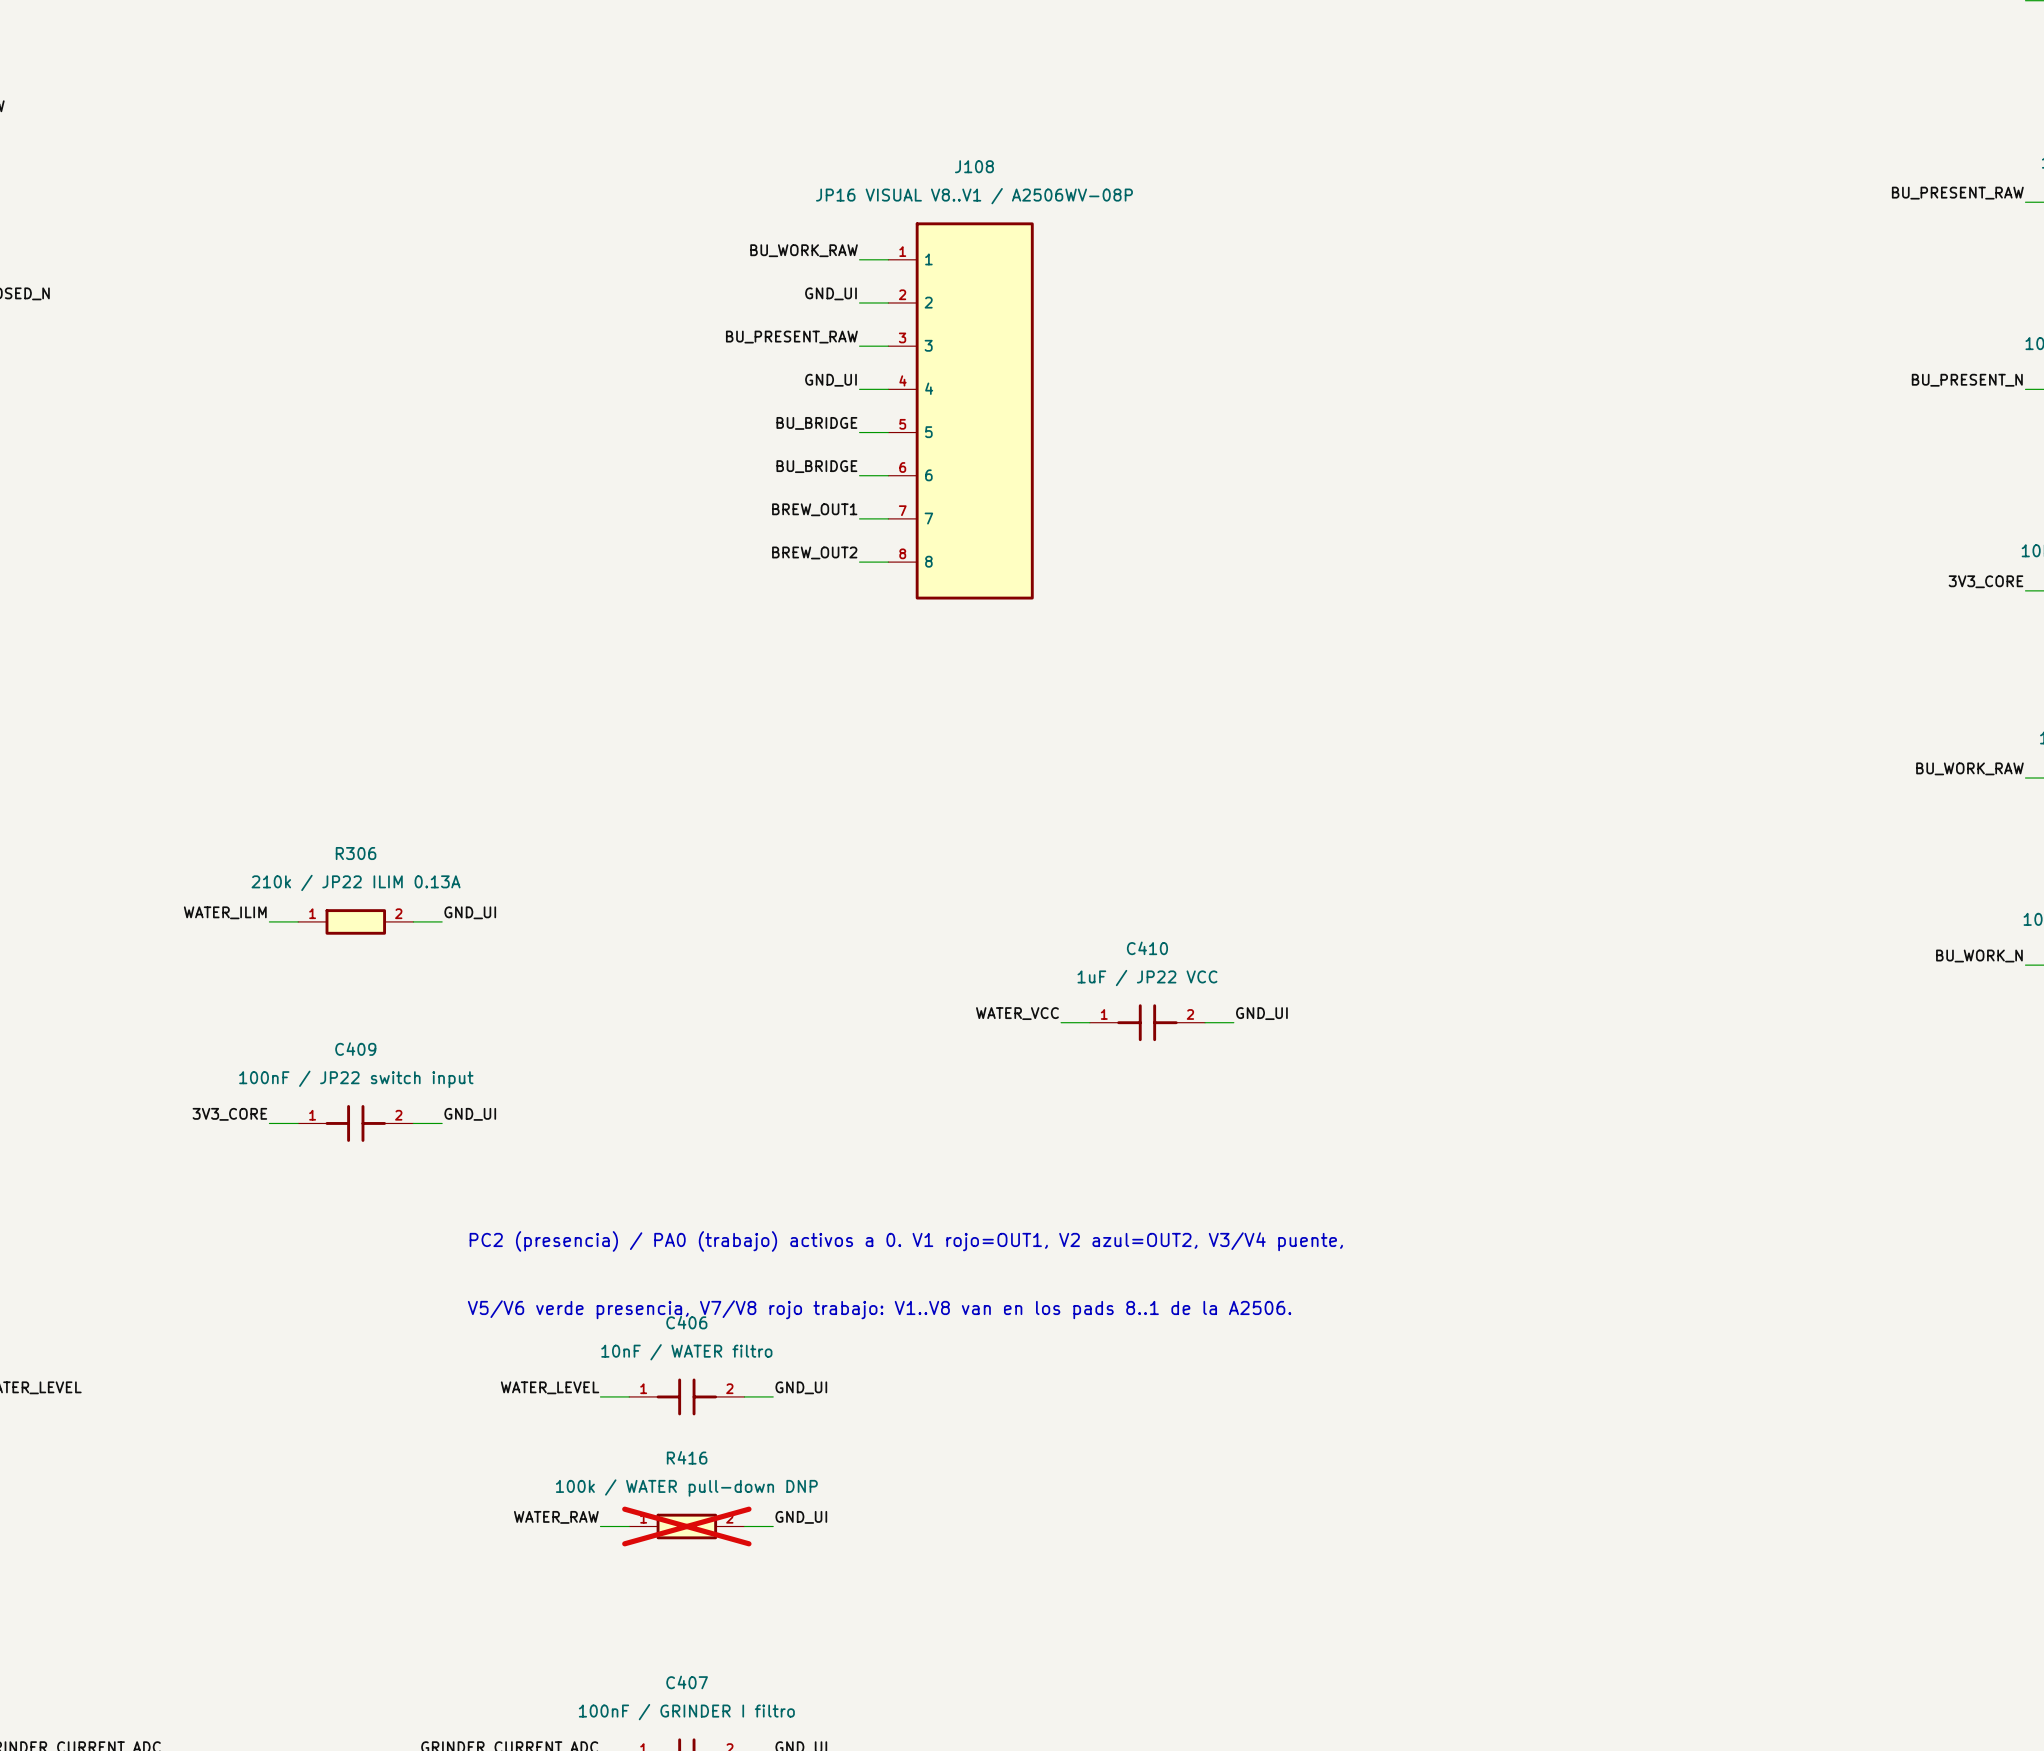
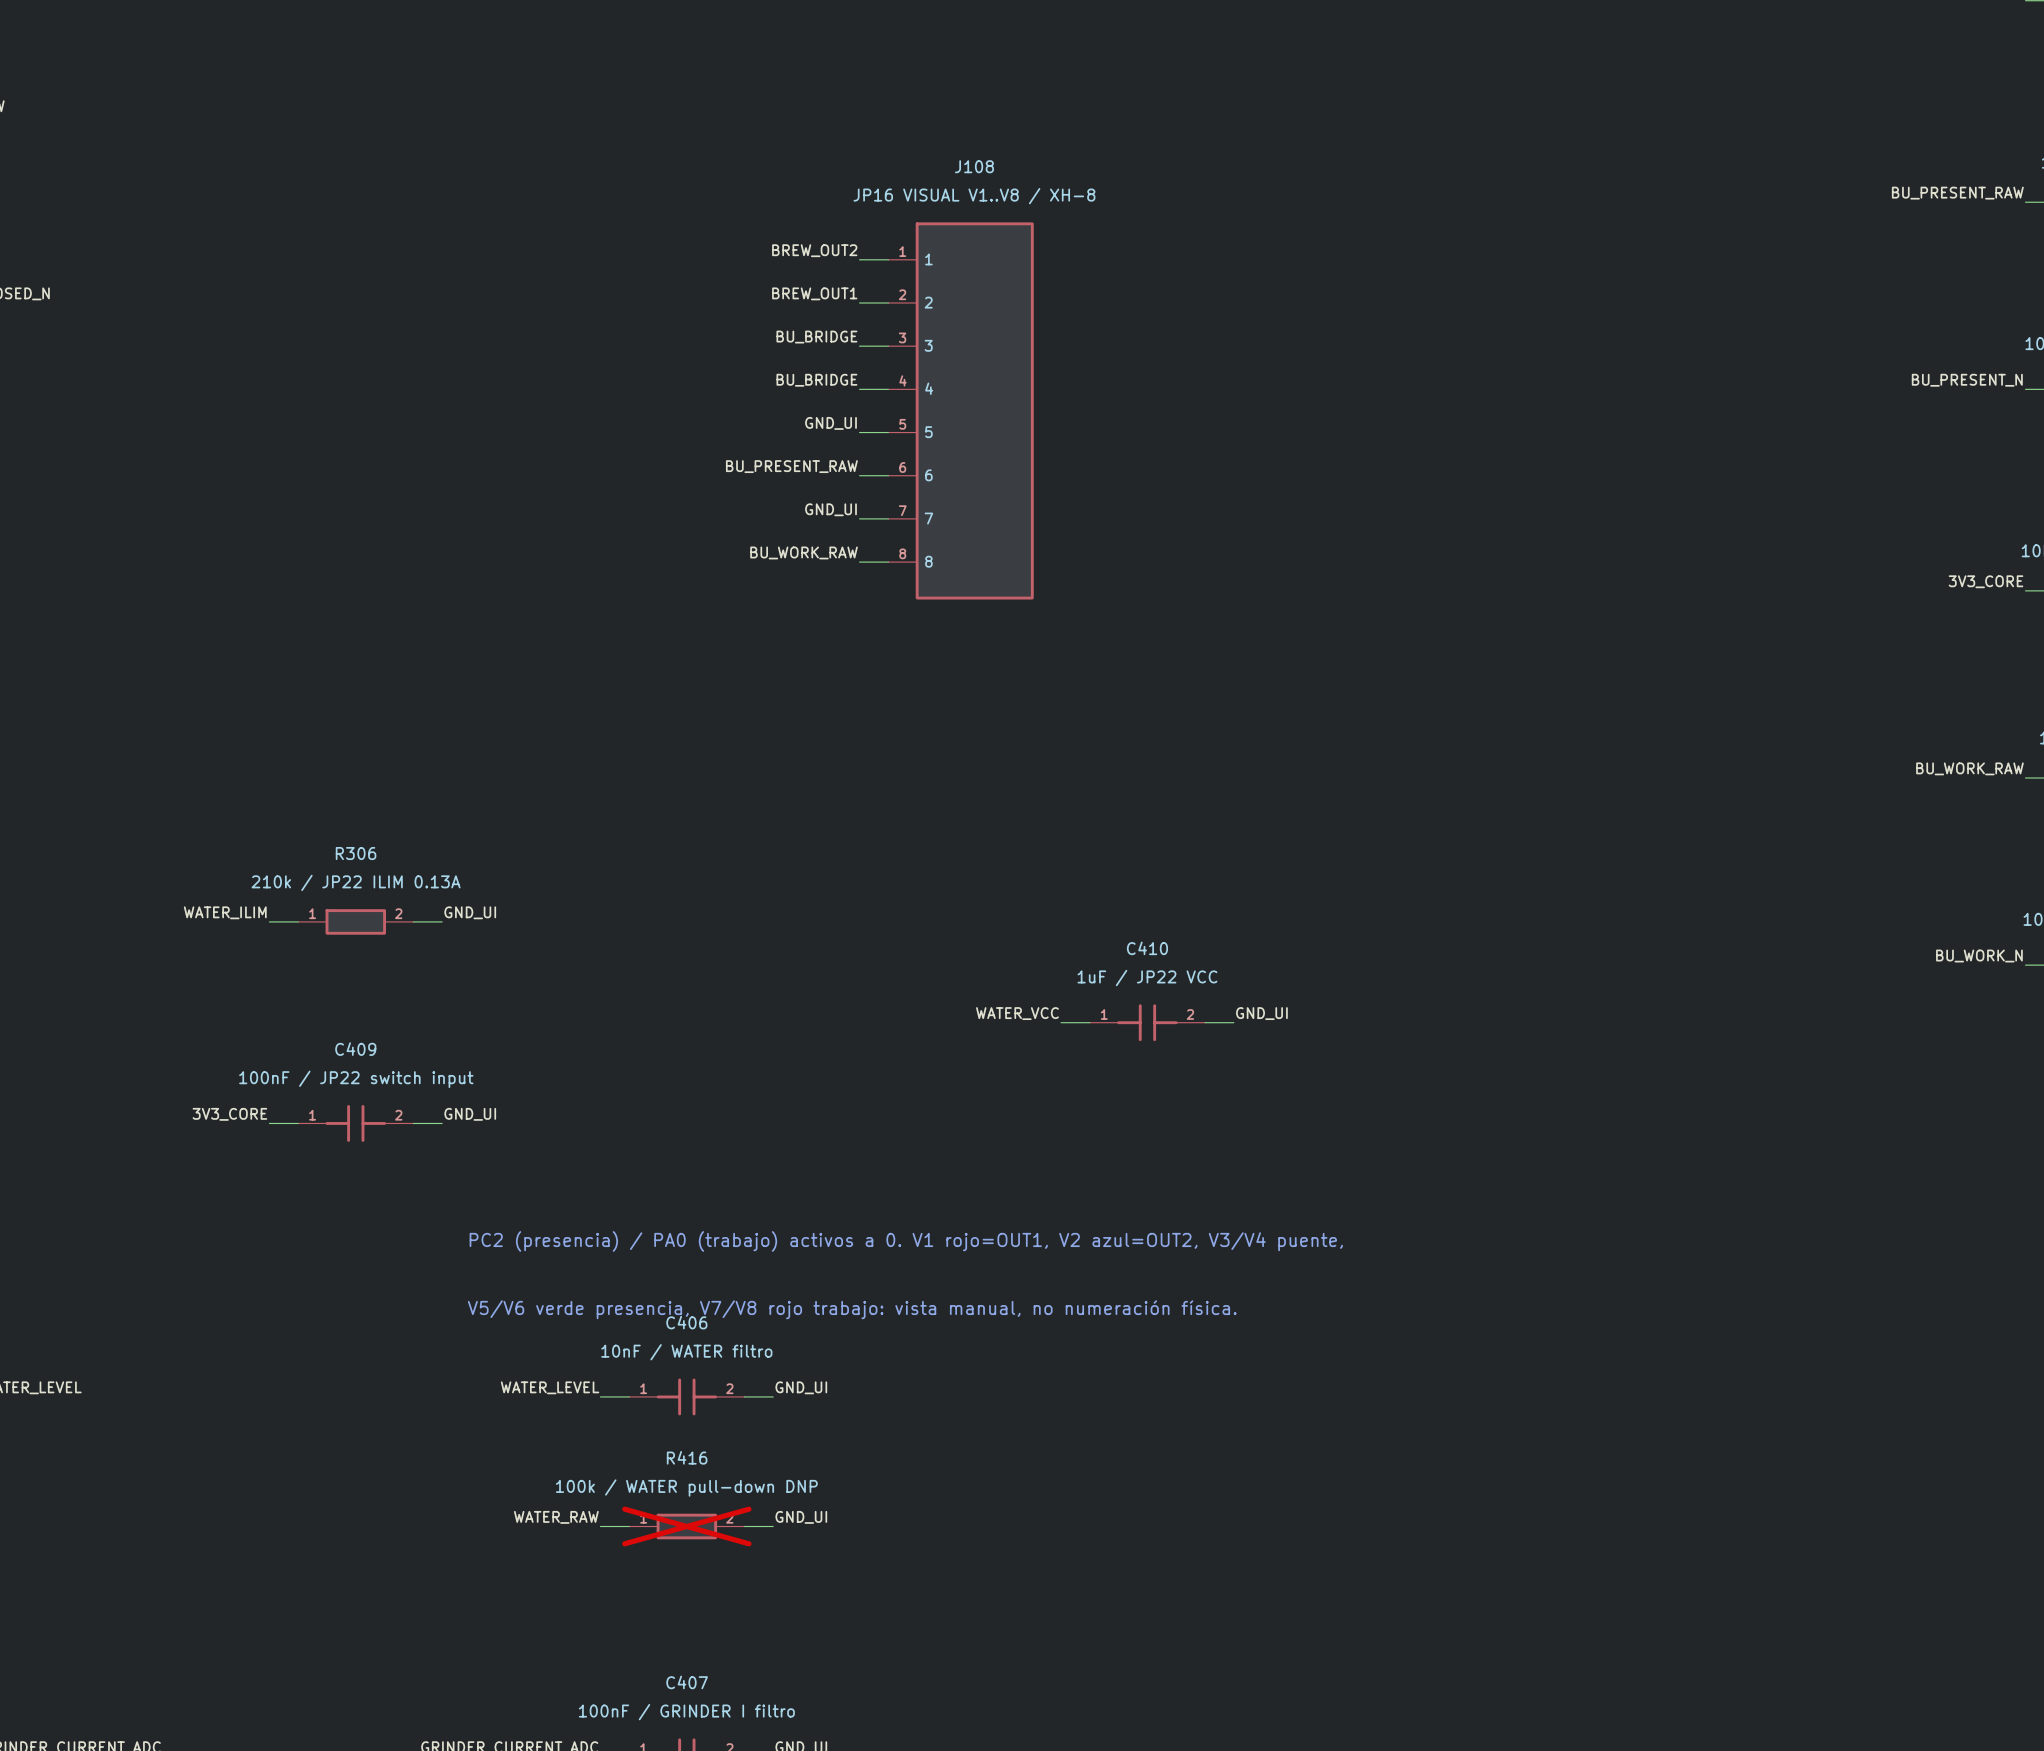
J108 value: JP16 VISUAL V8..V1 / A2506WV-08P (974, 196) -> JP16 VISUAL V1..V8 / XH-8 (974, 196)
label: BU_WORK_RAW (804, 250) -> BREW_OUT2 (814, 250)
label: GND_UI (830, 293) -> BREW_OUT1 (814, 293)
label: BU_PRESENT_RAW (791, 337) -> BU_BRIDGE (816, 337)
label: GND_UI (830, 380) -> BU_BRIDGE (816, 380)
label: BU_BRIDGE (816, 423) -> GND_UI (830, 423)
label: BU_BRIDGE (816, 466) -> BU_PRESENT_RAW (791, 466)
label: BREW_OUT1 (814, 509) -> GND_UI (830, 509)
label: BREW_OUT2 (814, 552) -> BU_WORK_RAW (804, 552)
text: V5/V6 verde presencia, V7/V8 rojo trabajo: V1..V8 van en los pads 8..1 de la A2506. (879, 1309) -> V5/V6 verde presencia, V7/V8 rojo trabajo: vista manual, no numeración física. (852, 1309)

